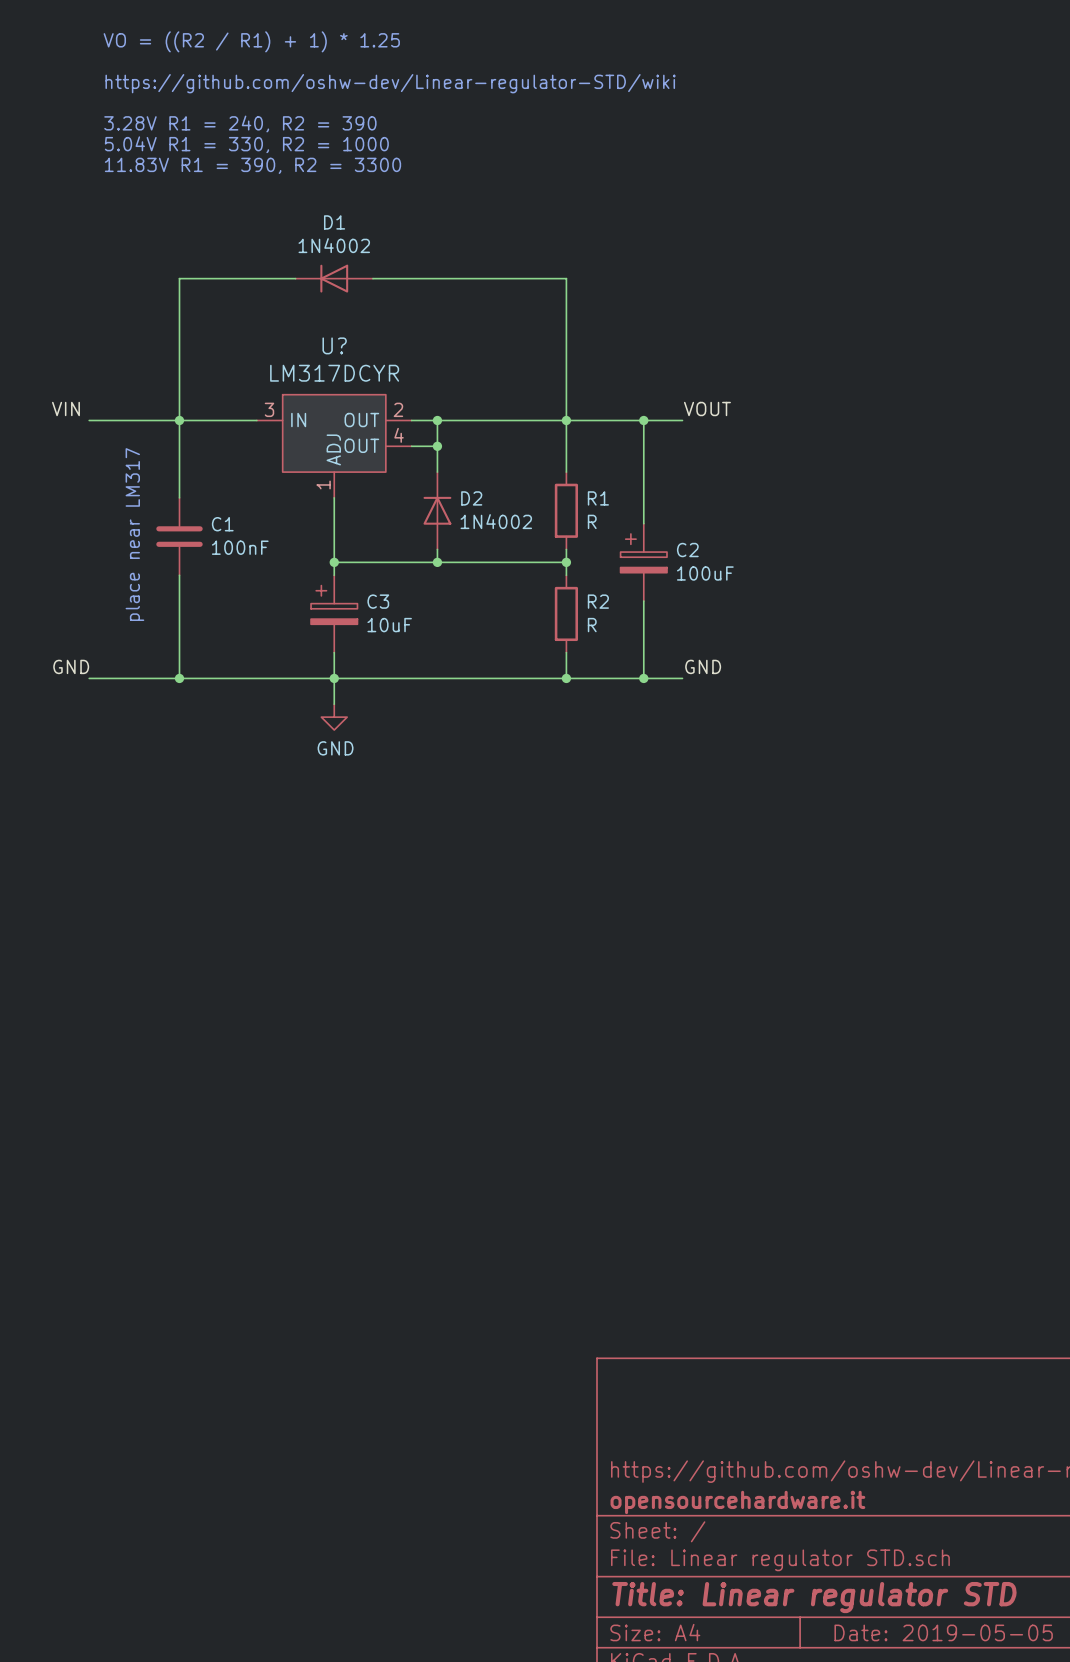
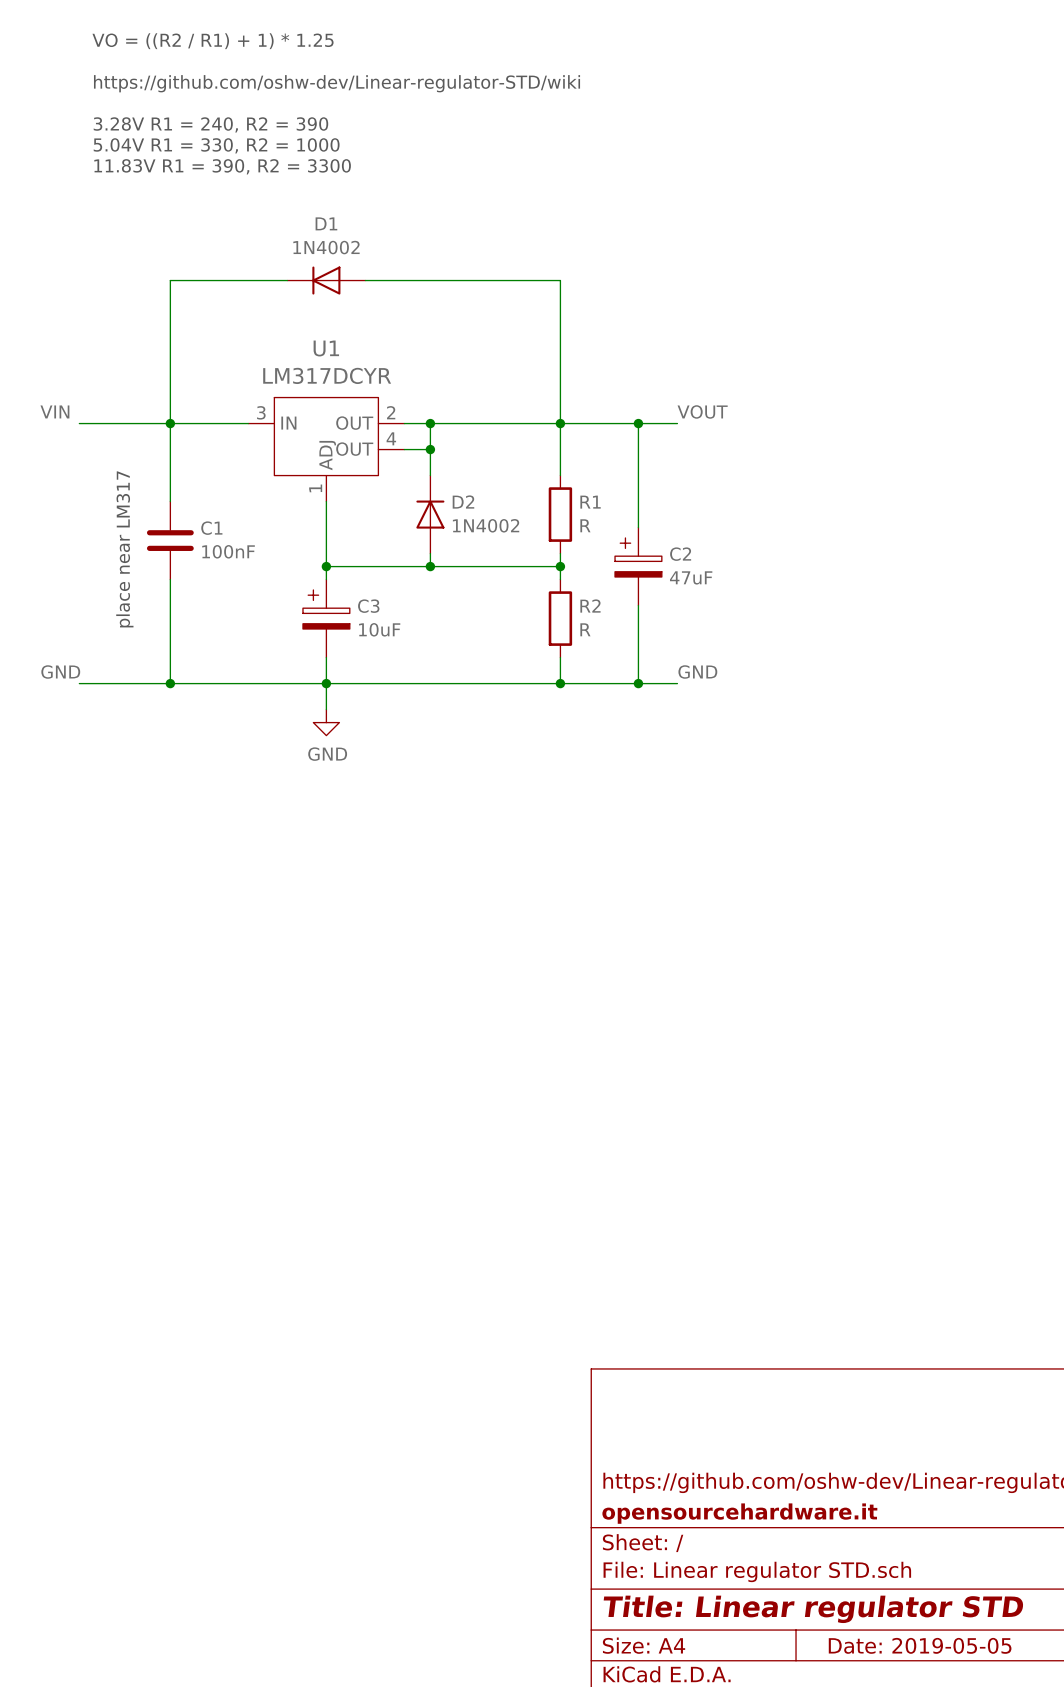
U? name: U? (334, 345) -> U1 (326, 348)
C2 value: 100uF (705, 573) -> 47uF (691, 577)

